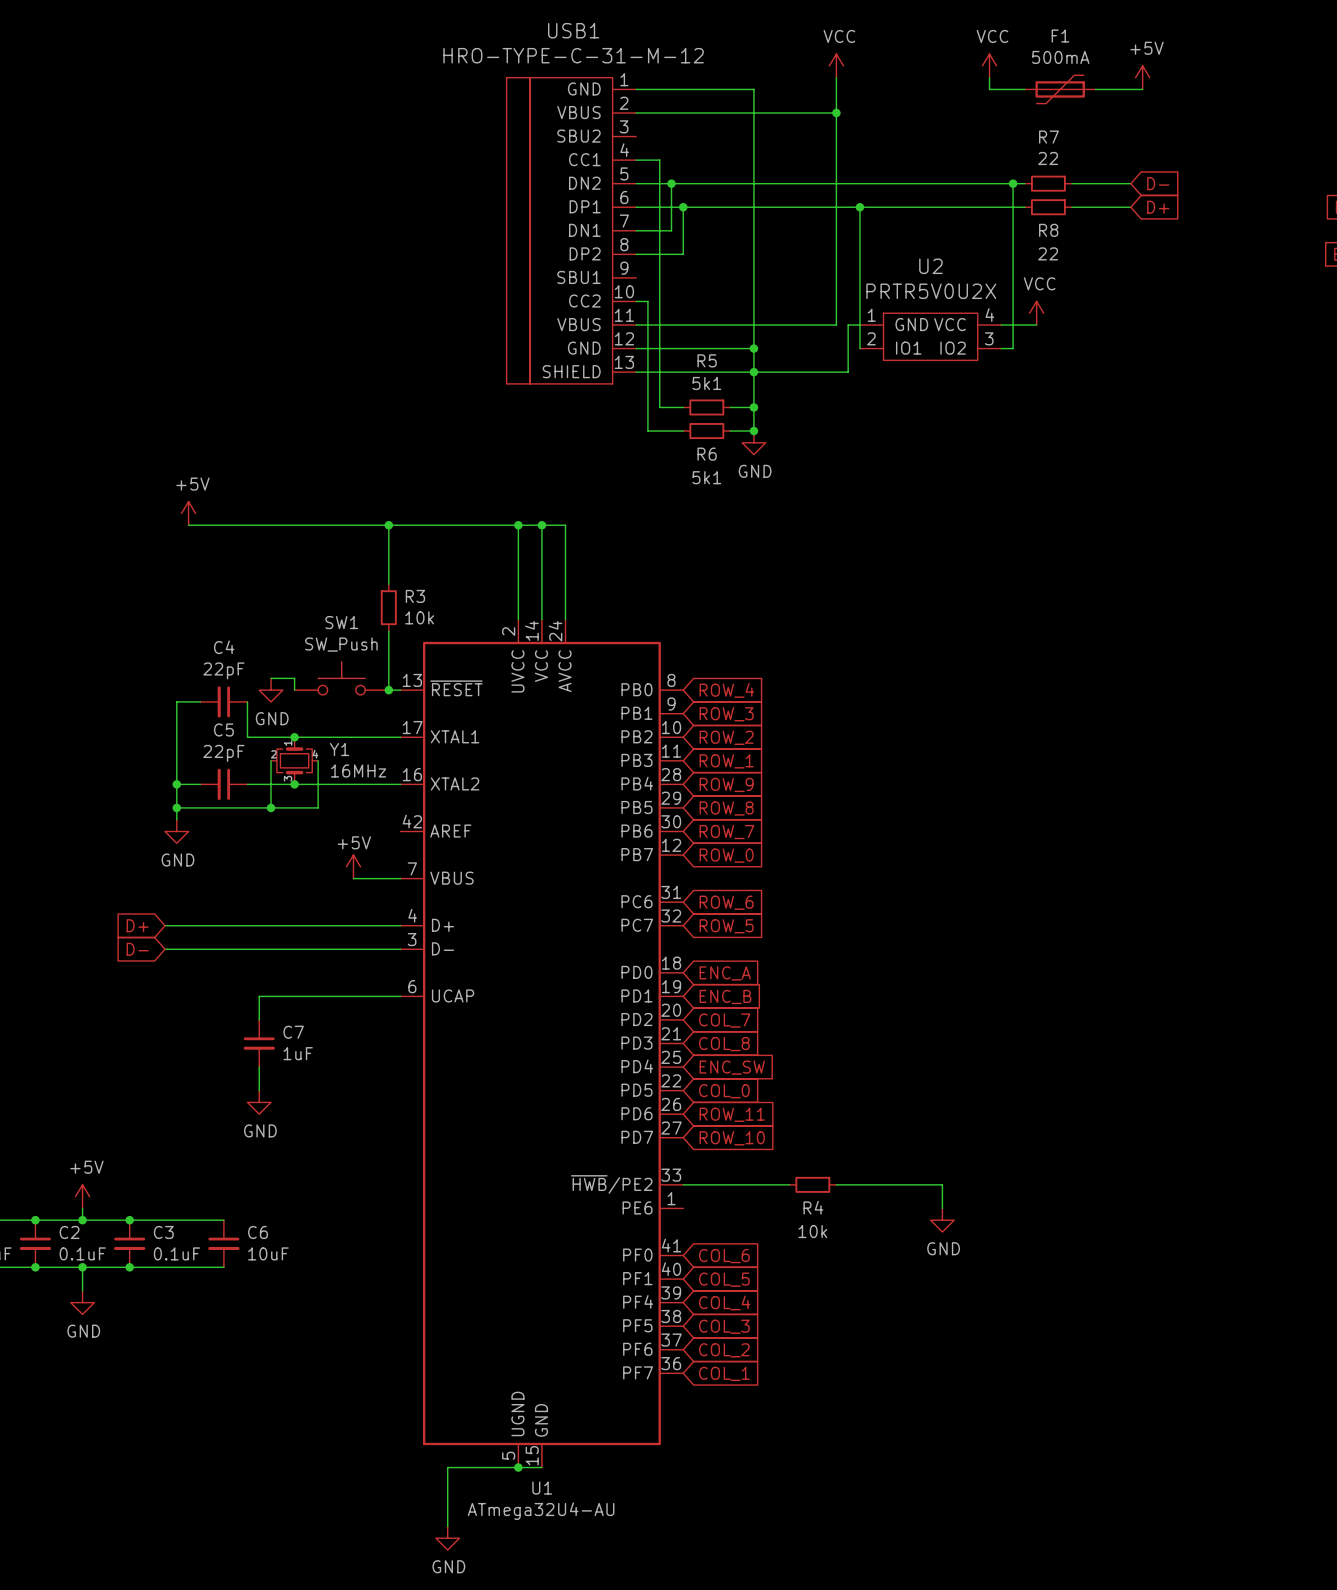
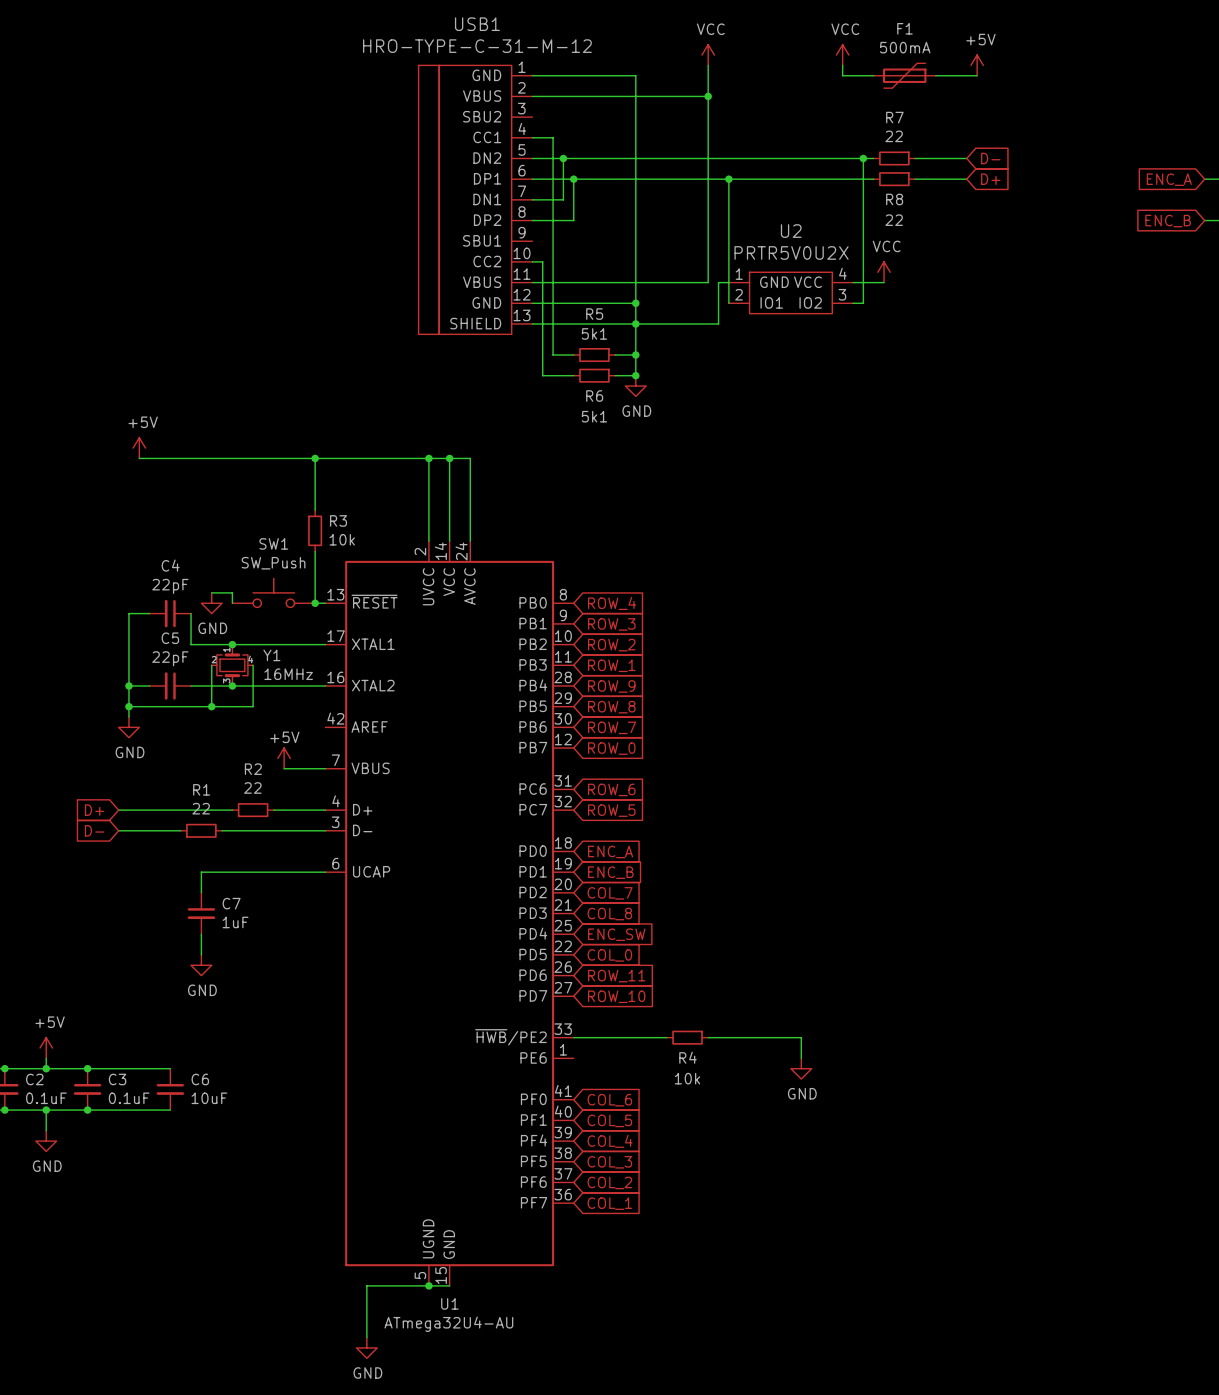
wire: (294, 925) (341, 925) -> none
R2: none -> 22 (253, 810)
wire: (235, 949) (282, 949) -> none
R1: none -> 22 (201, 830)

